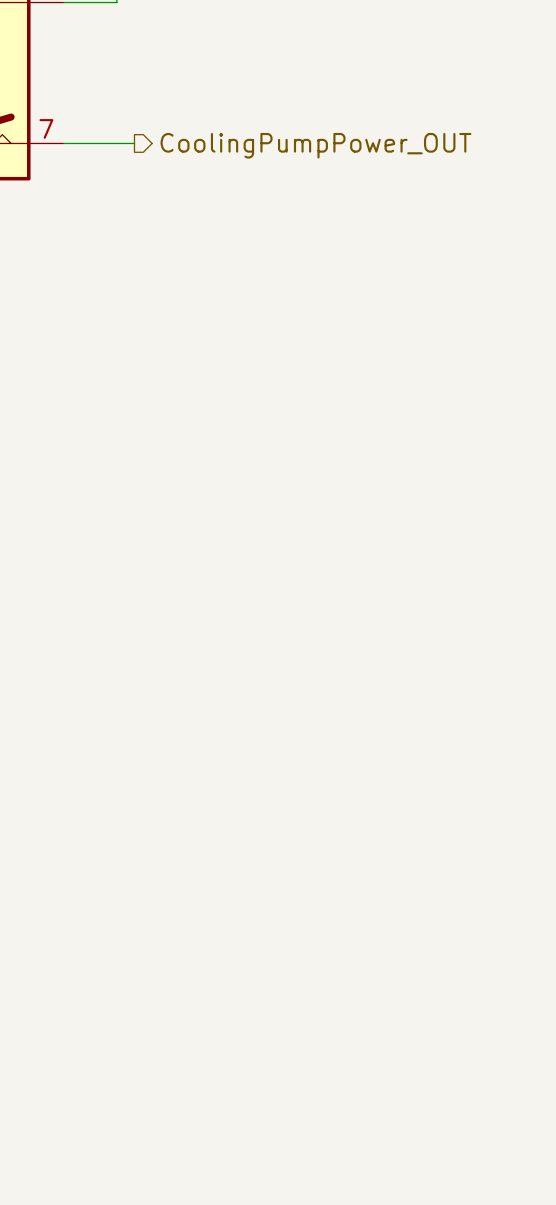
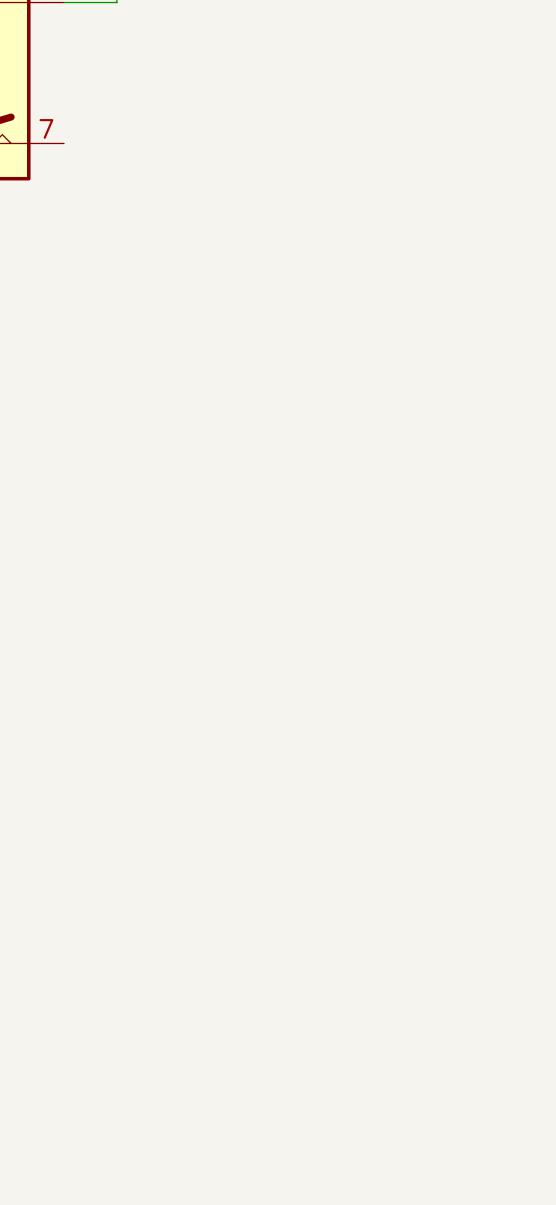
wire: (64, 143) (134, 143) -> none
hierarchical label: CoolingPumpPower_OUT (315, 145) -> none

